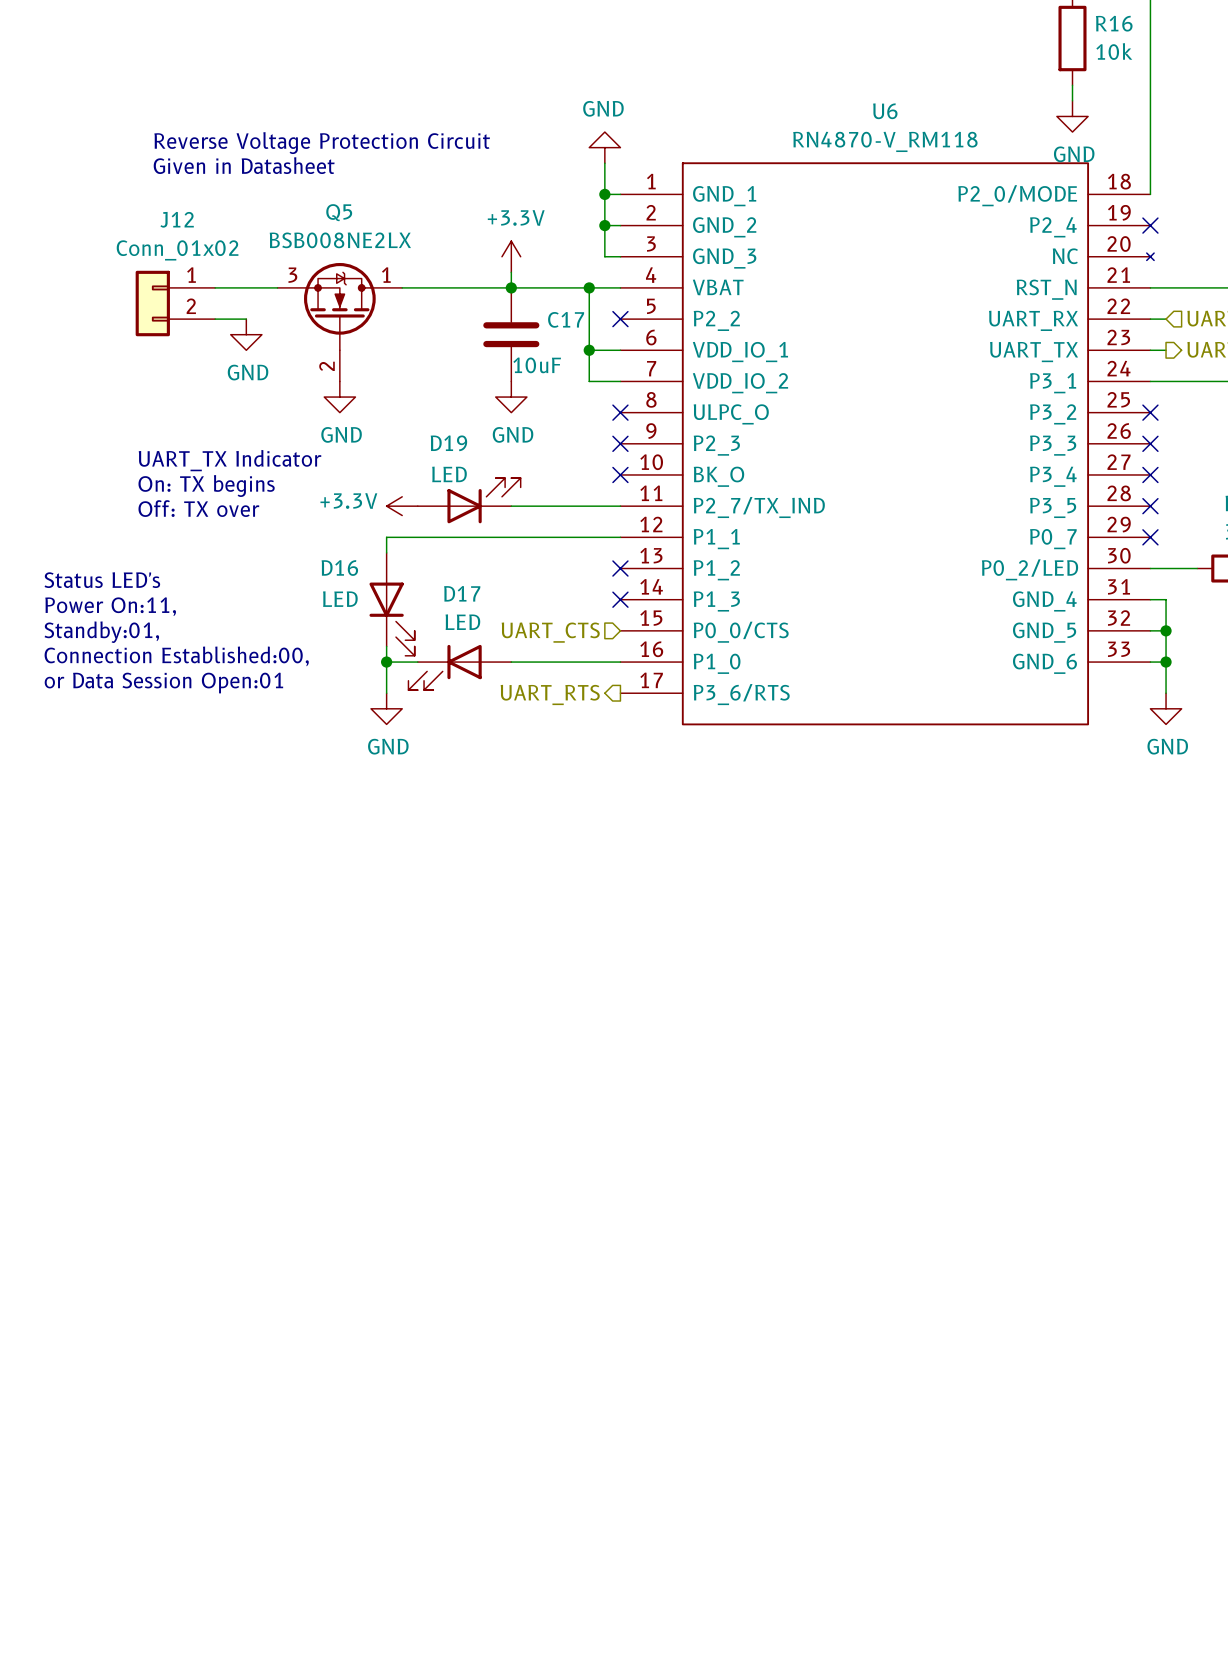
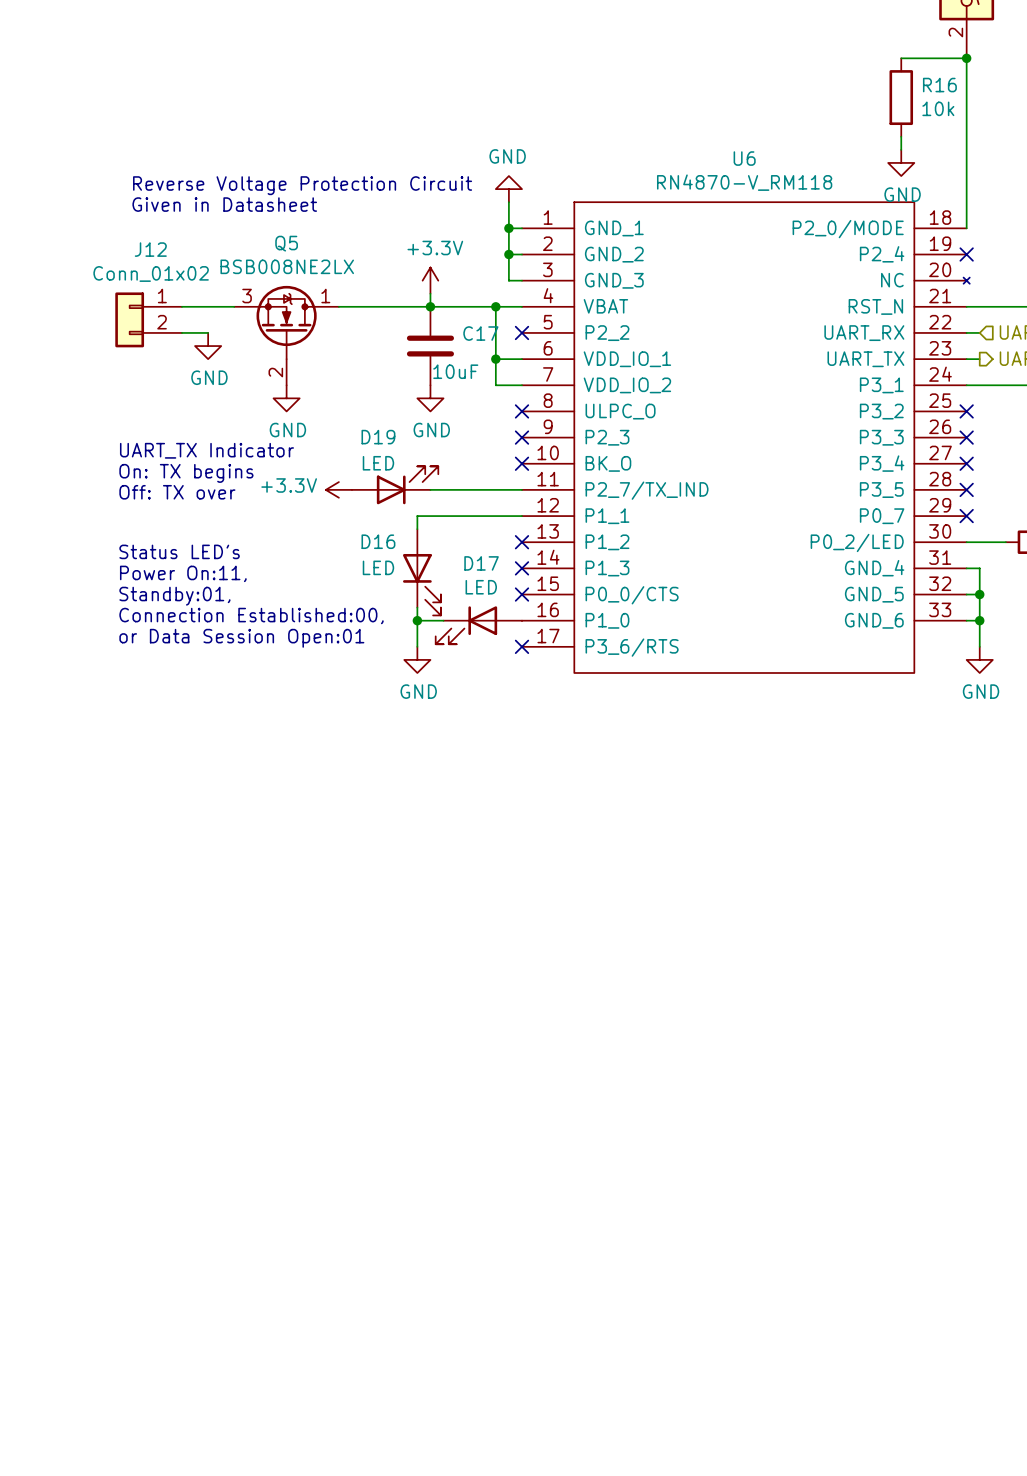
wire: (495, 537) (386, 537) (386, 552) -> (417, 516) (417, 529)
text position: Status LED's (102, 580) -> Status LED's (179, 551)
D16 position: (392, 604) -> (421, 572)
text position: Power On:11, (110, 606) -> Power On:11, (183, 573)
no-connect mark: none -> (522, 594)
text position: Standby:01, (101, 632) -> Standby:01, (174, 596)
hierarchical label: UART_CTS (550, 632) -> none
wire: (386, 646) (386, 693) -> (417, 607) (417, 646)
text position: Connection Established:00, (176, 656) -> Connection Established:00, (251, 616)
wire: (386, 662) (417, 662) -> none
junction: (386, 662) -> none
junction: none -> (417, 620)
D17 position: (459, 667) -> (478, 625)
text position: or Data Session Open:01 (163, 683) -> or Data Session Open:01 (241, 638)
no-connect mark: none -> (522, 646)
hierarchical label: UART_RTS (550, 694) -> none
power symbol position: GND (386, 708) -> GND (417, 659)

